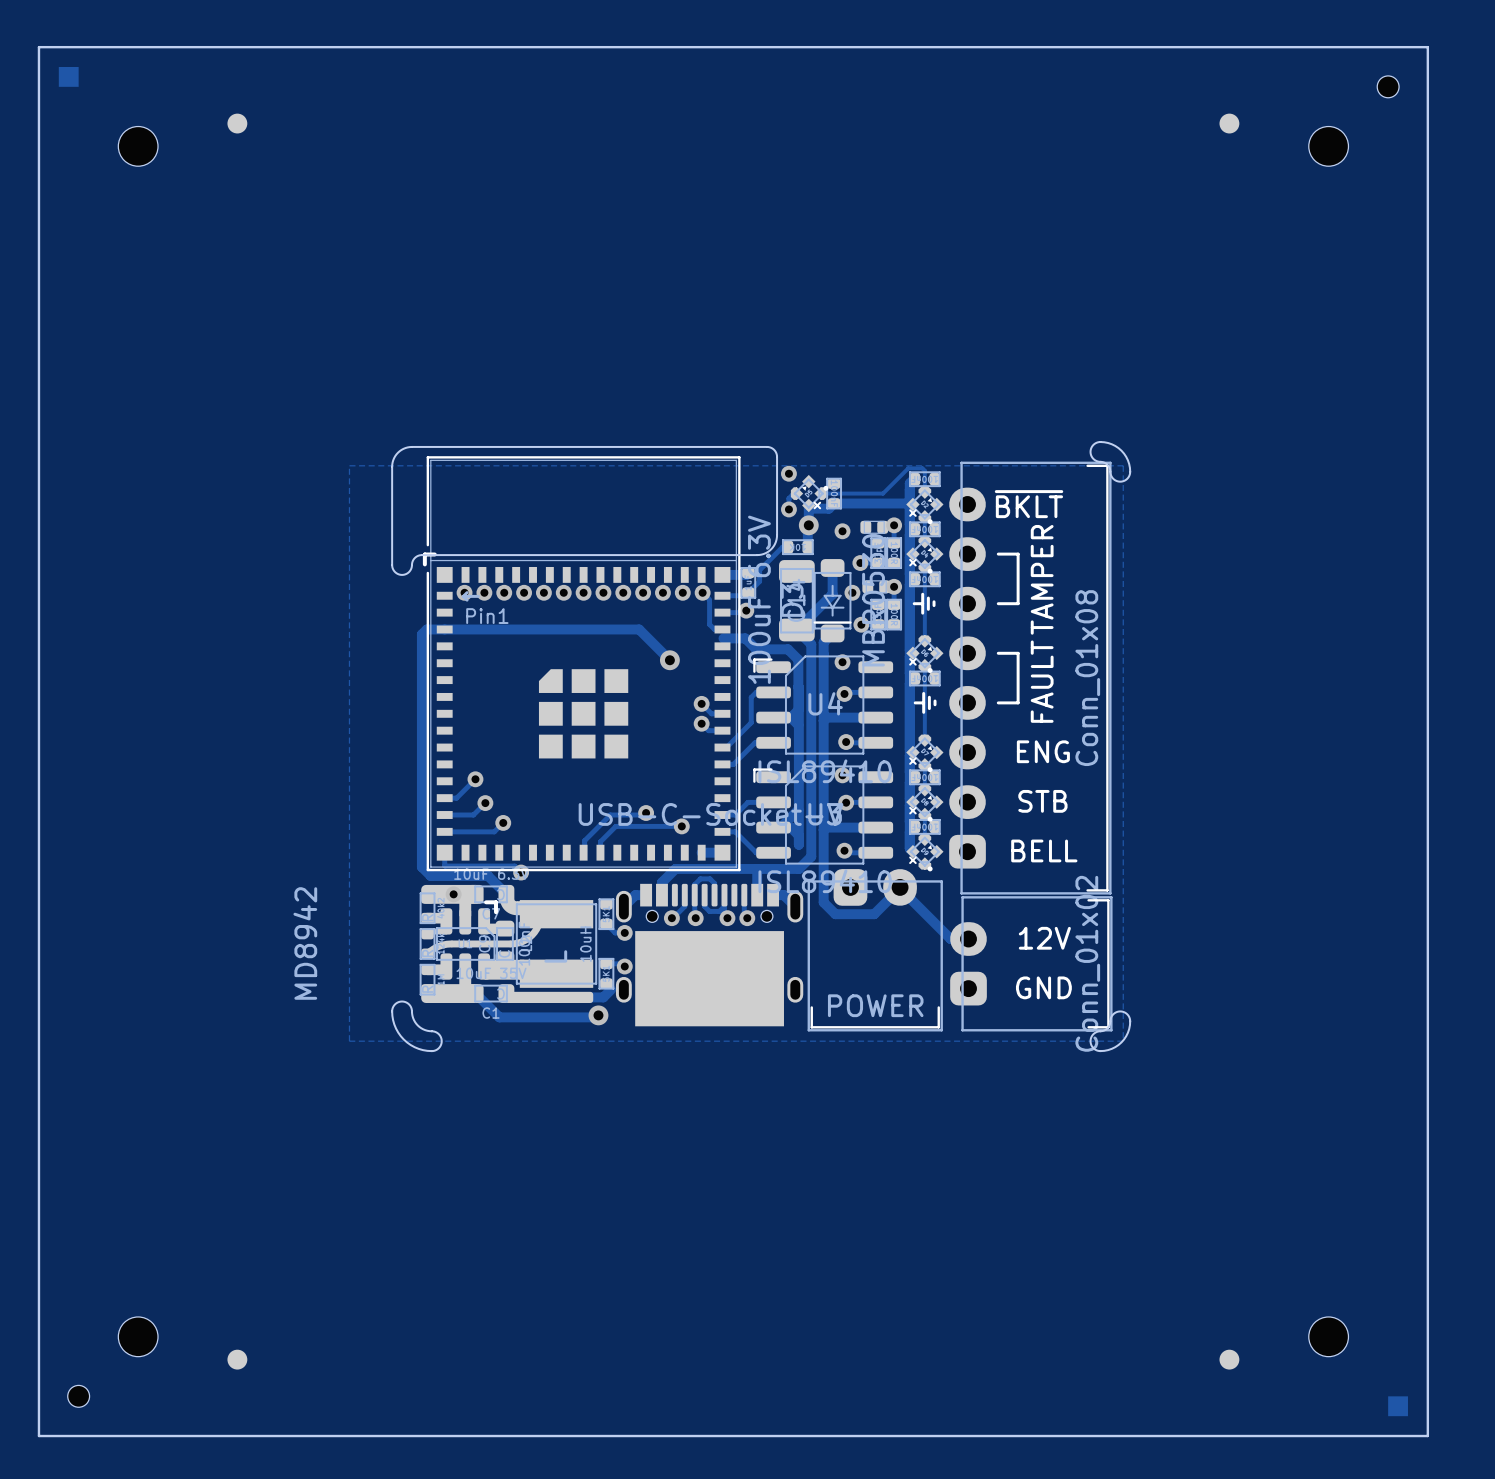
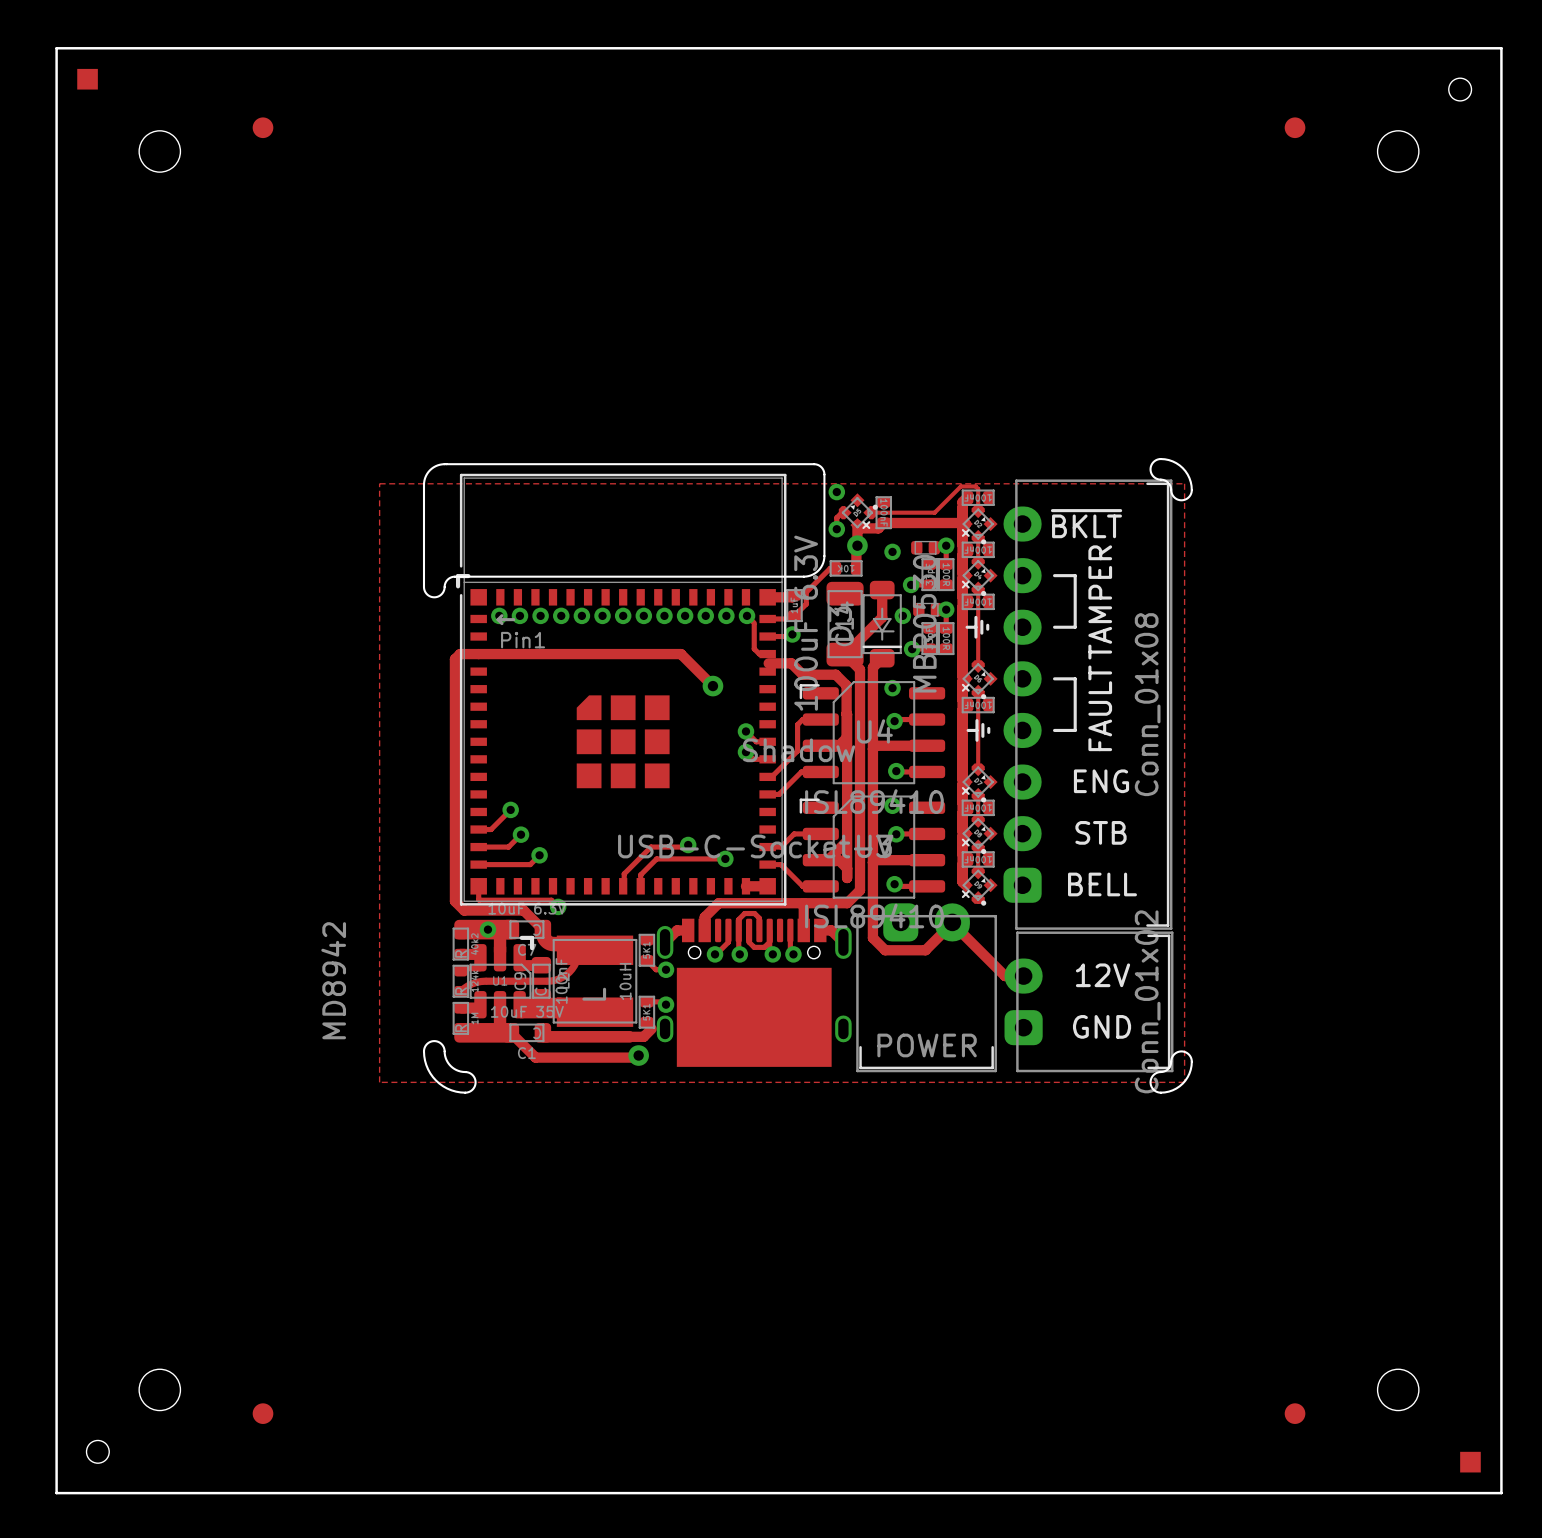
drawing: none -> [743, 738, 856, 763]

